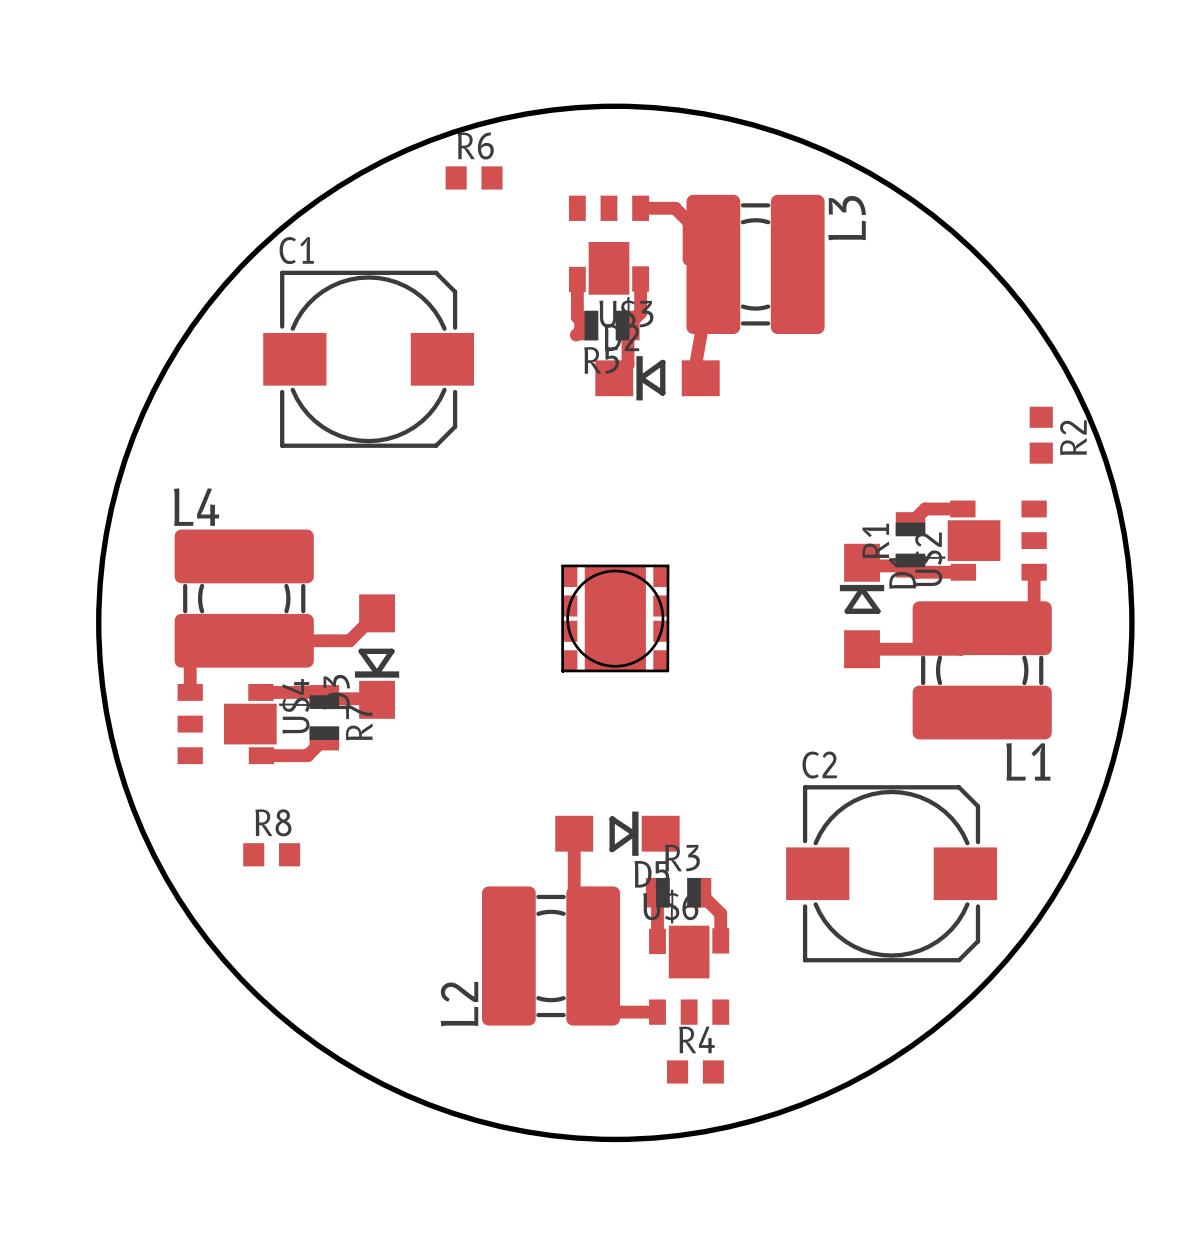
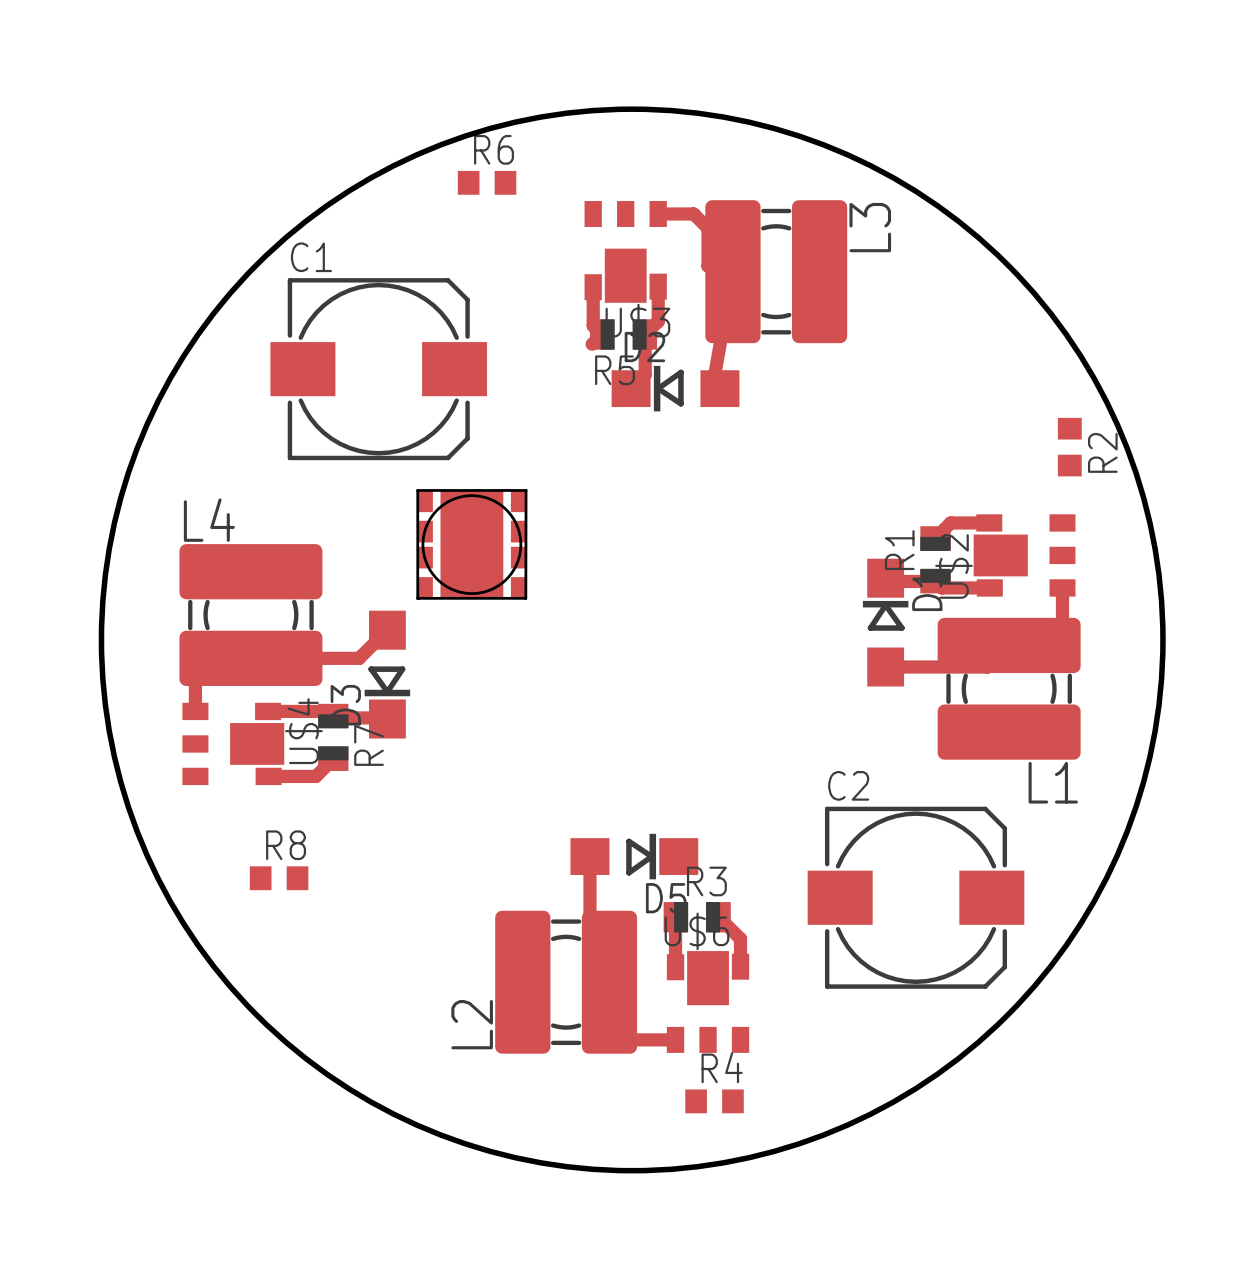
part position: (615, 618) -> (471, 544)

